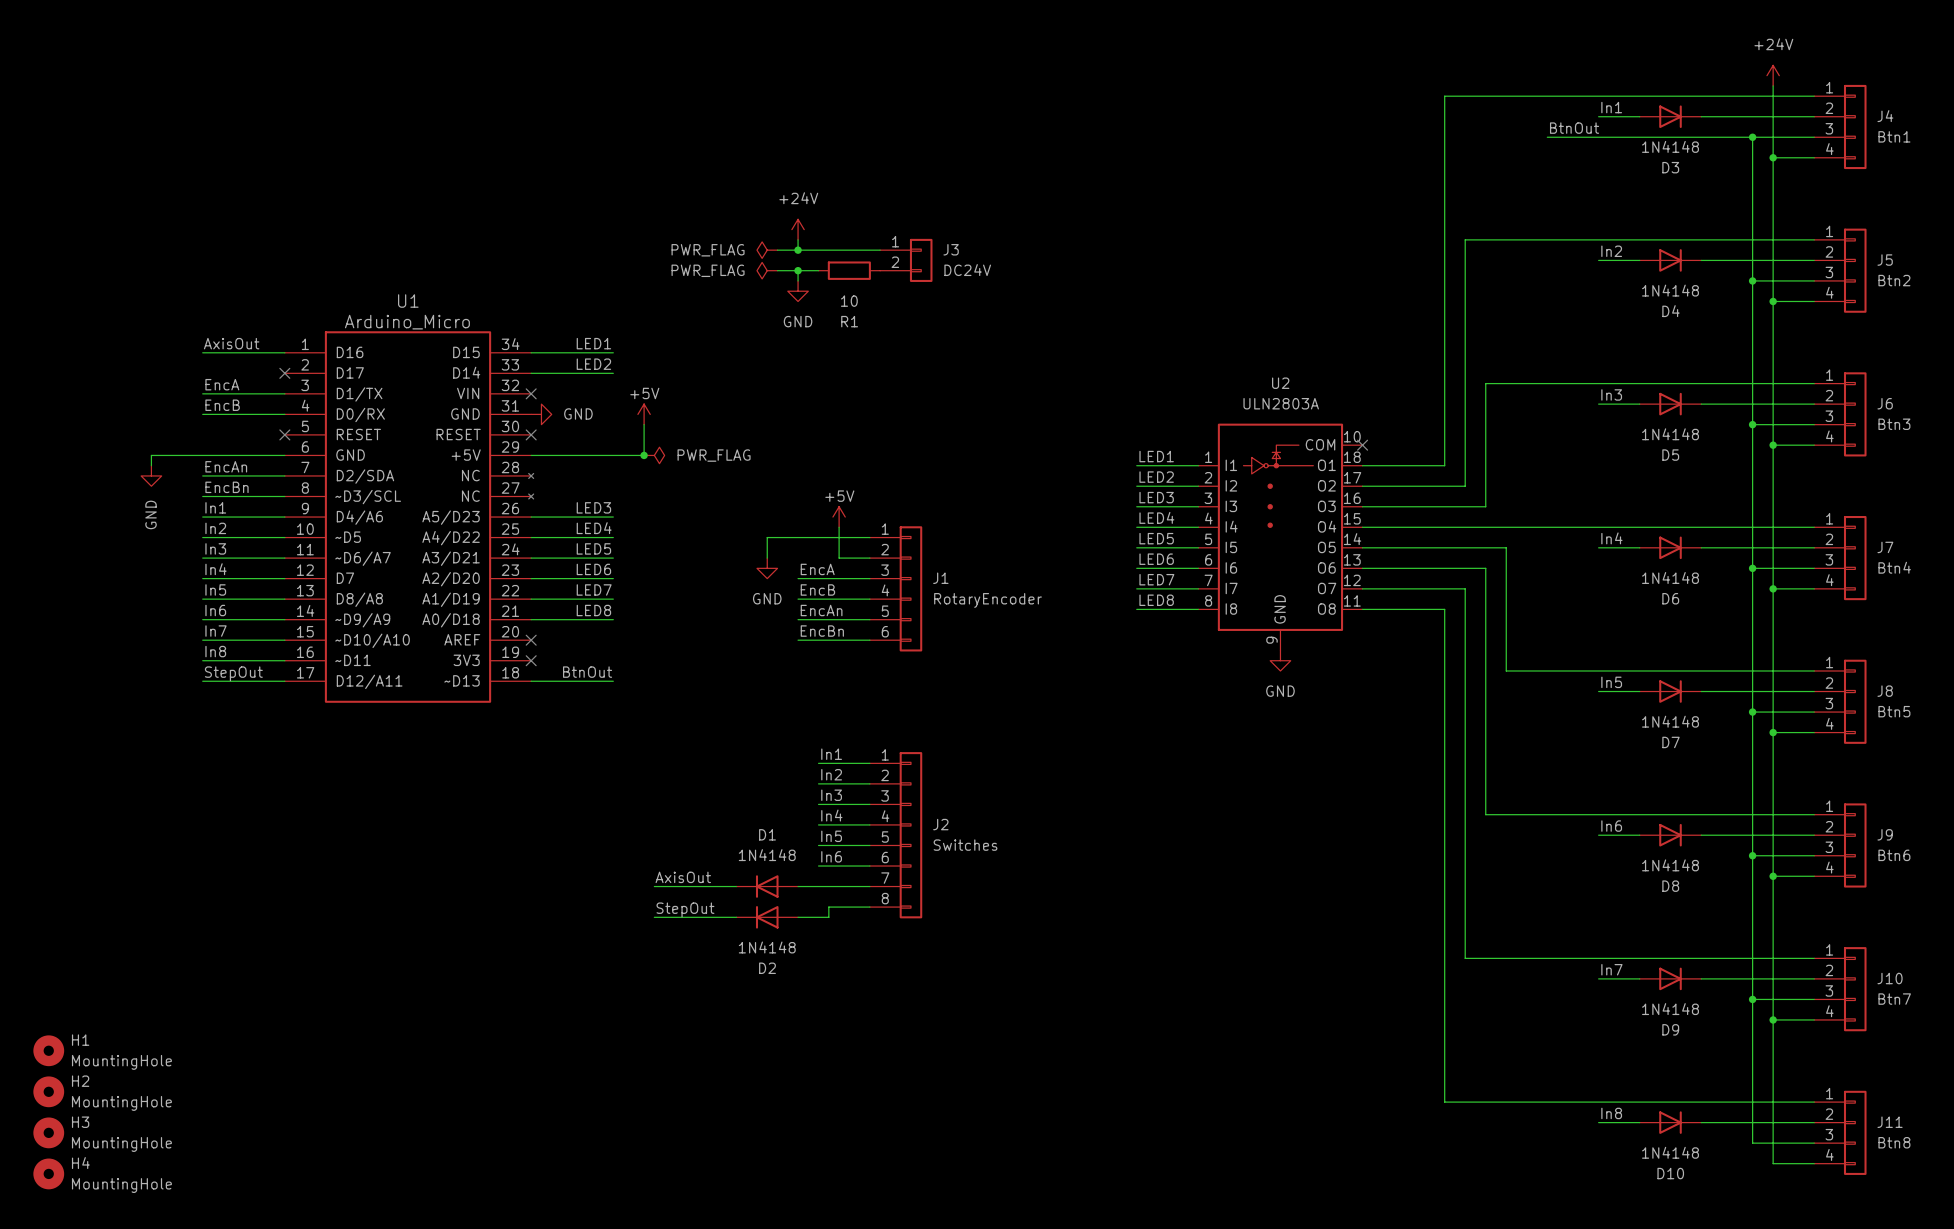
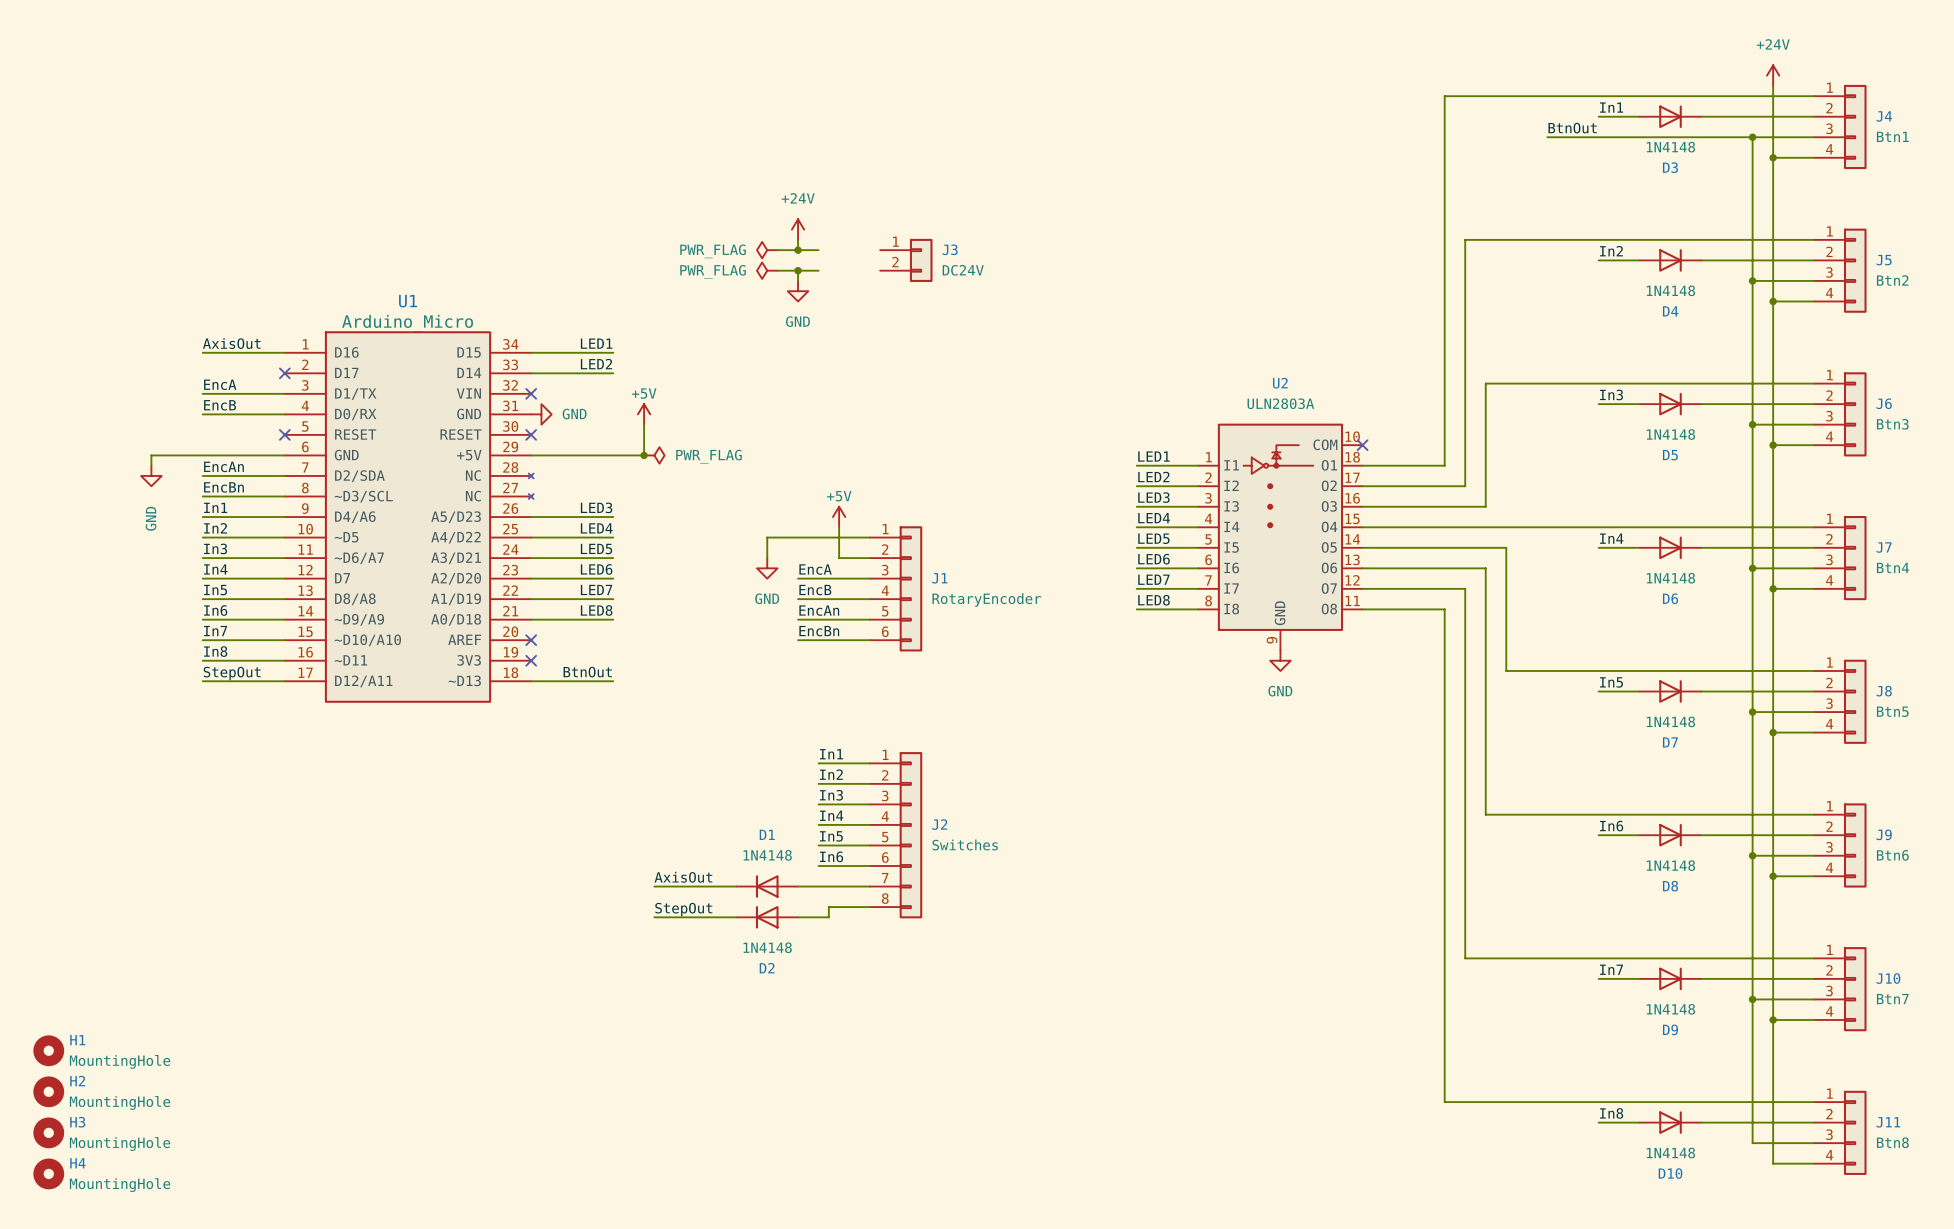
wire: (818, 250) (880, 250) -> none
R1: 10 (849, 270) -> none

